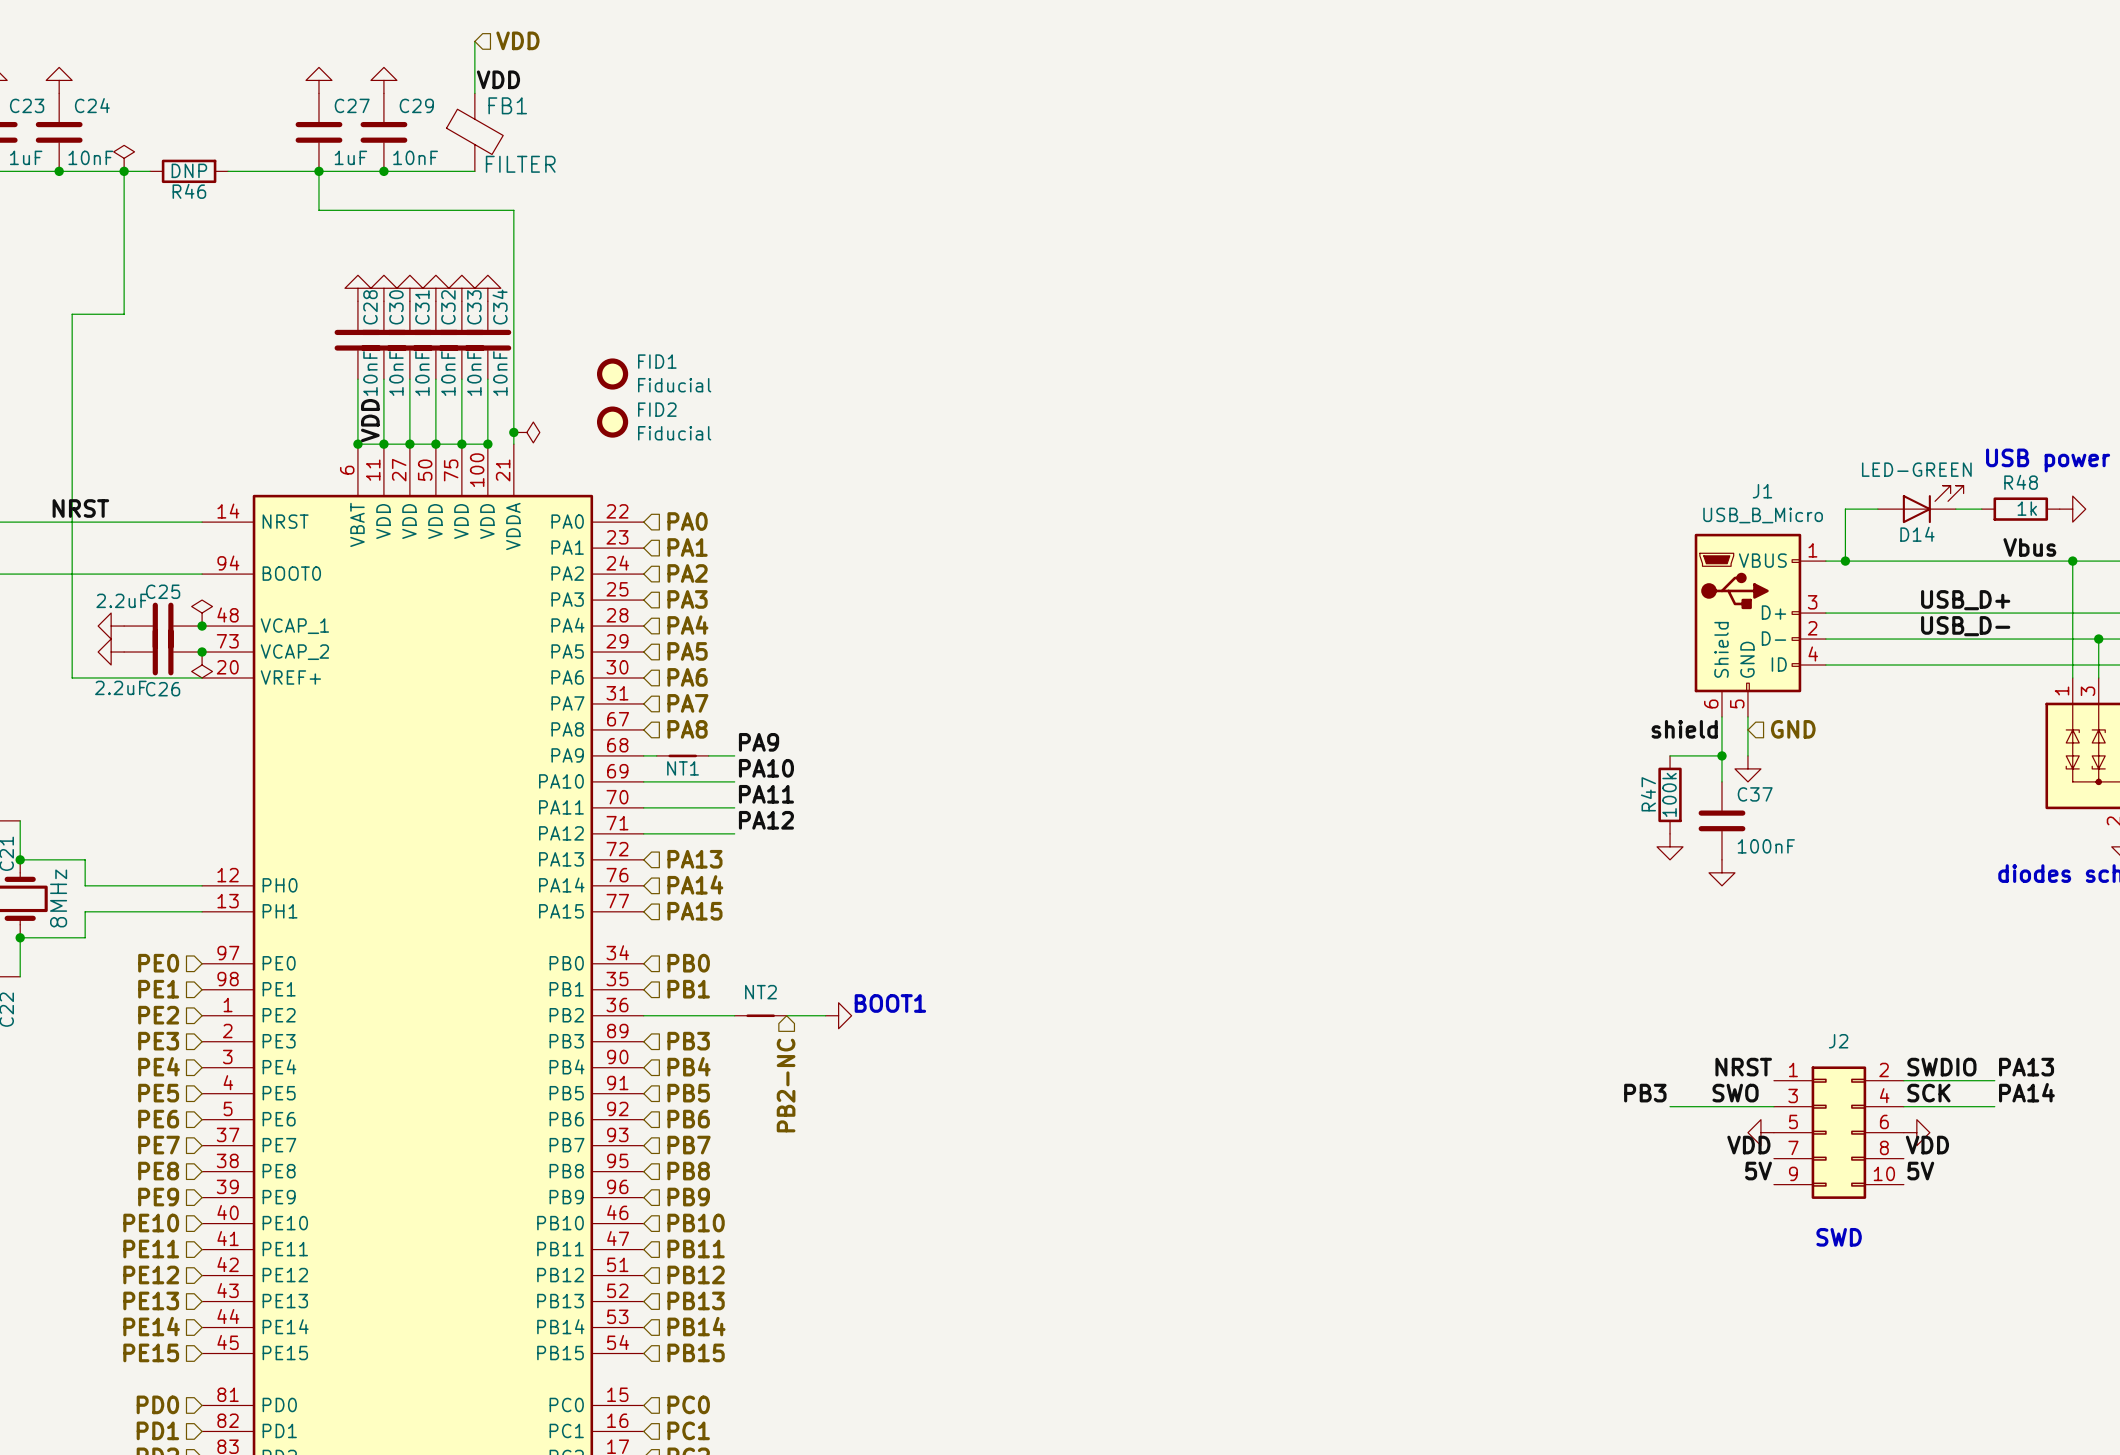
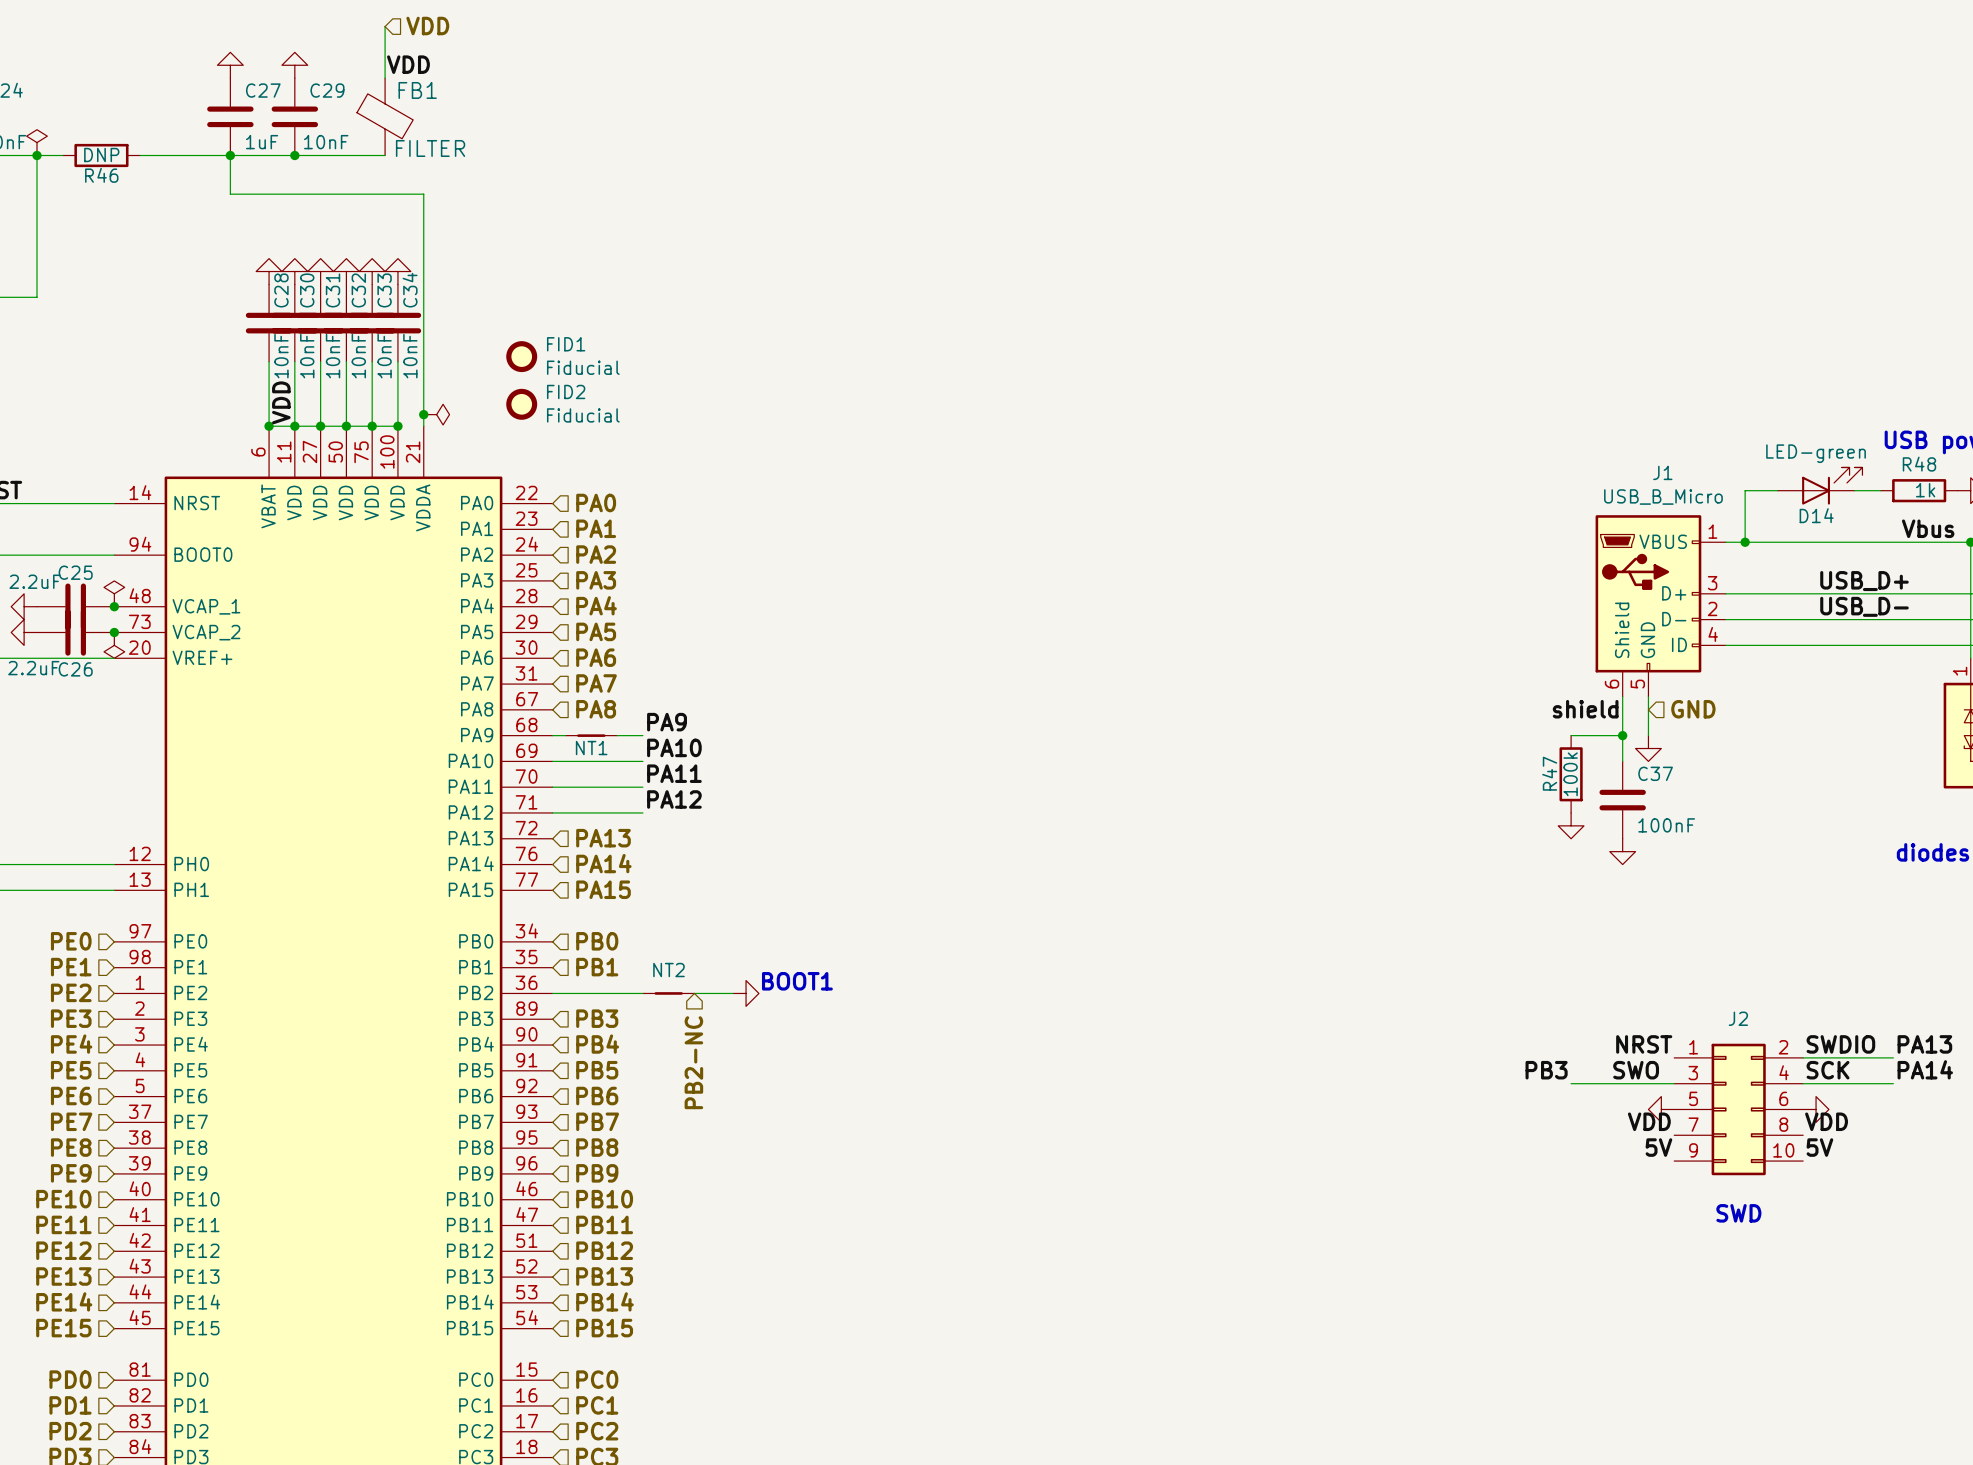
D14 value: LED-GREEN (1916, 469) -> LED-green (1816, 453)

